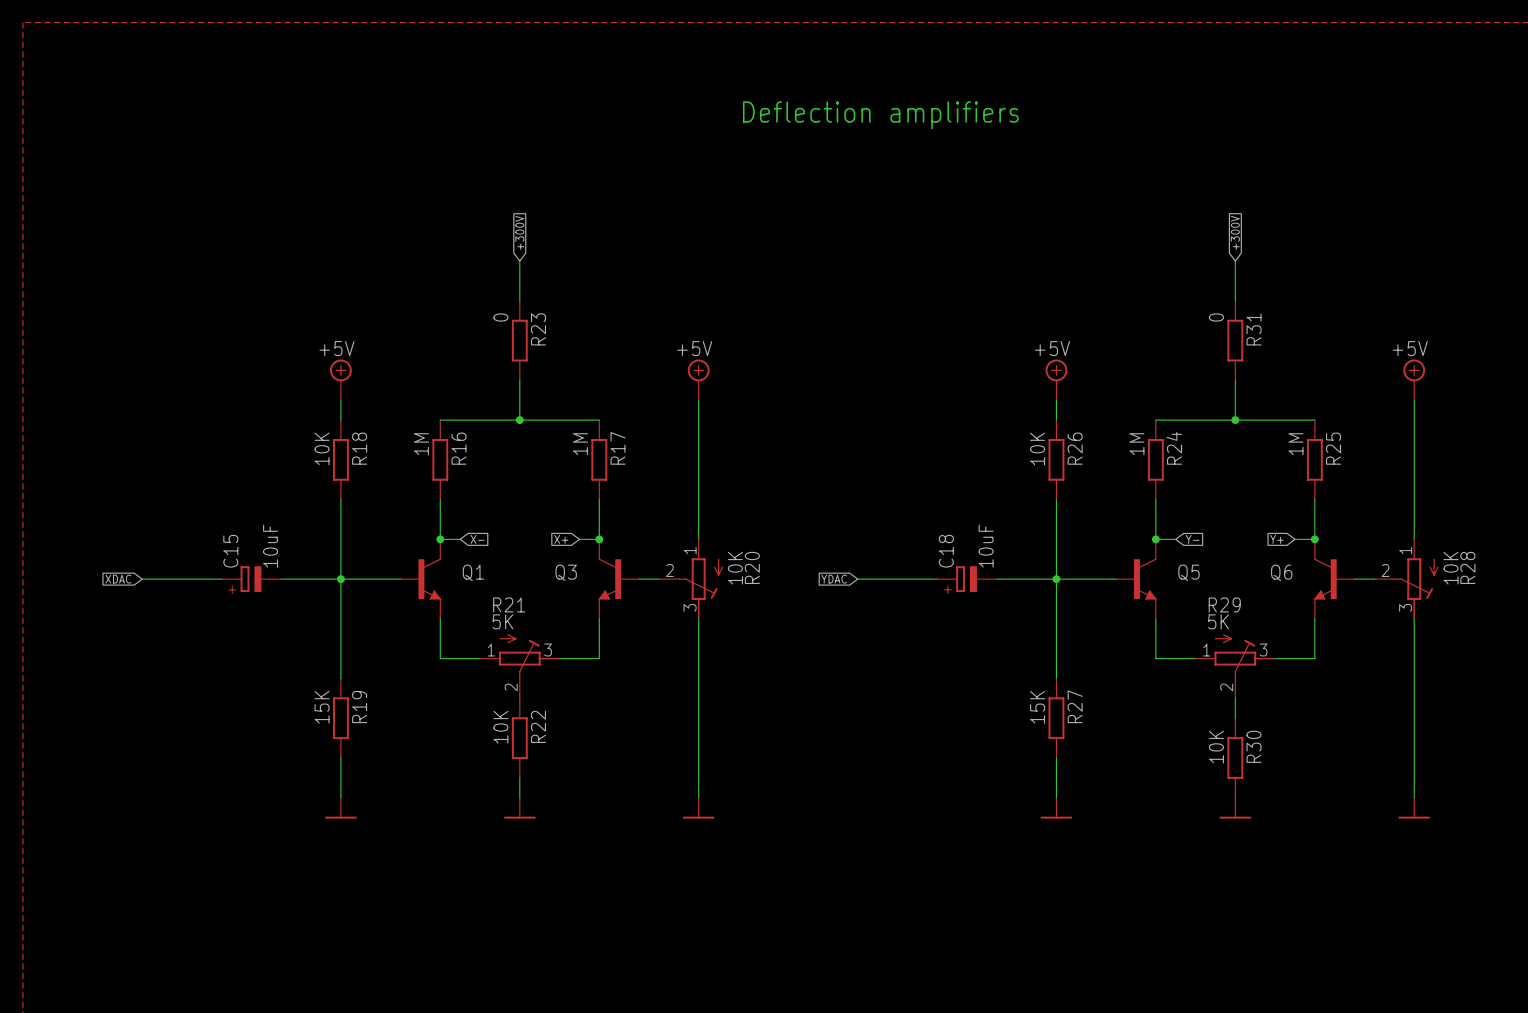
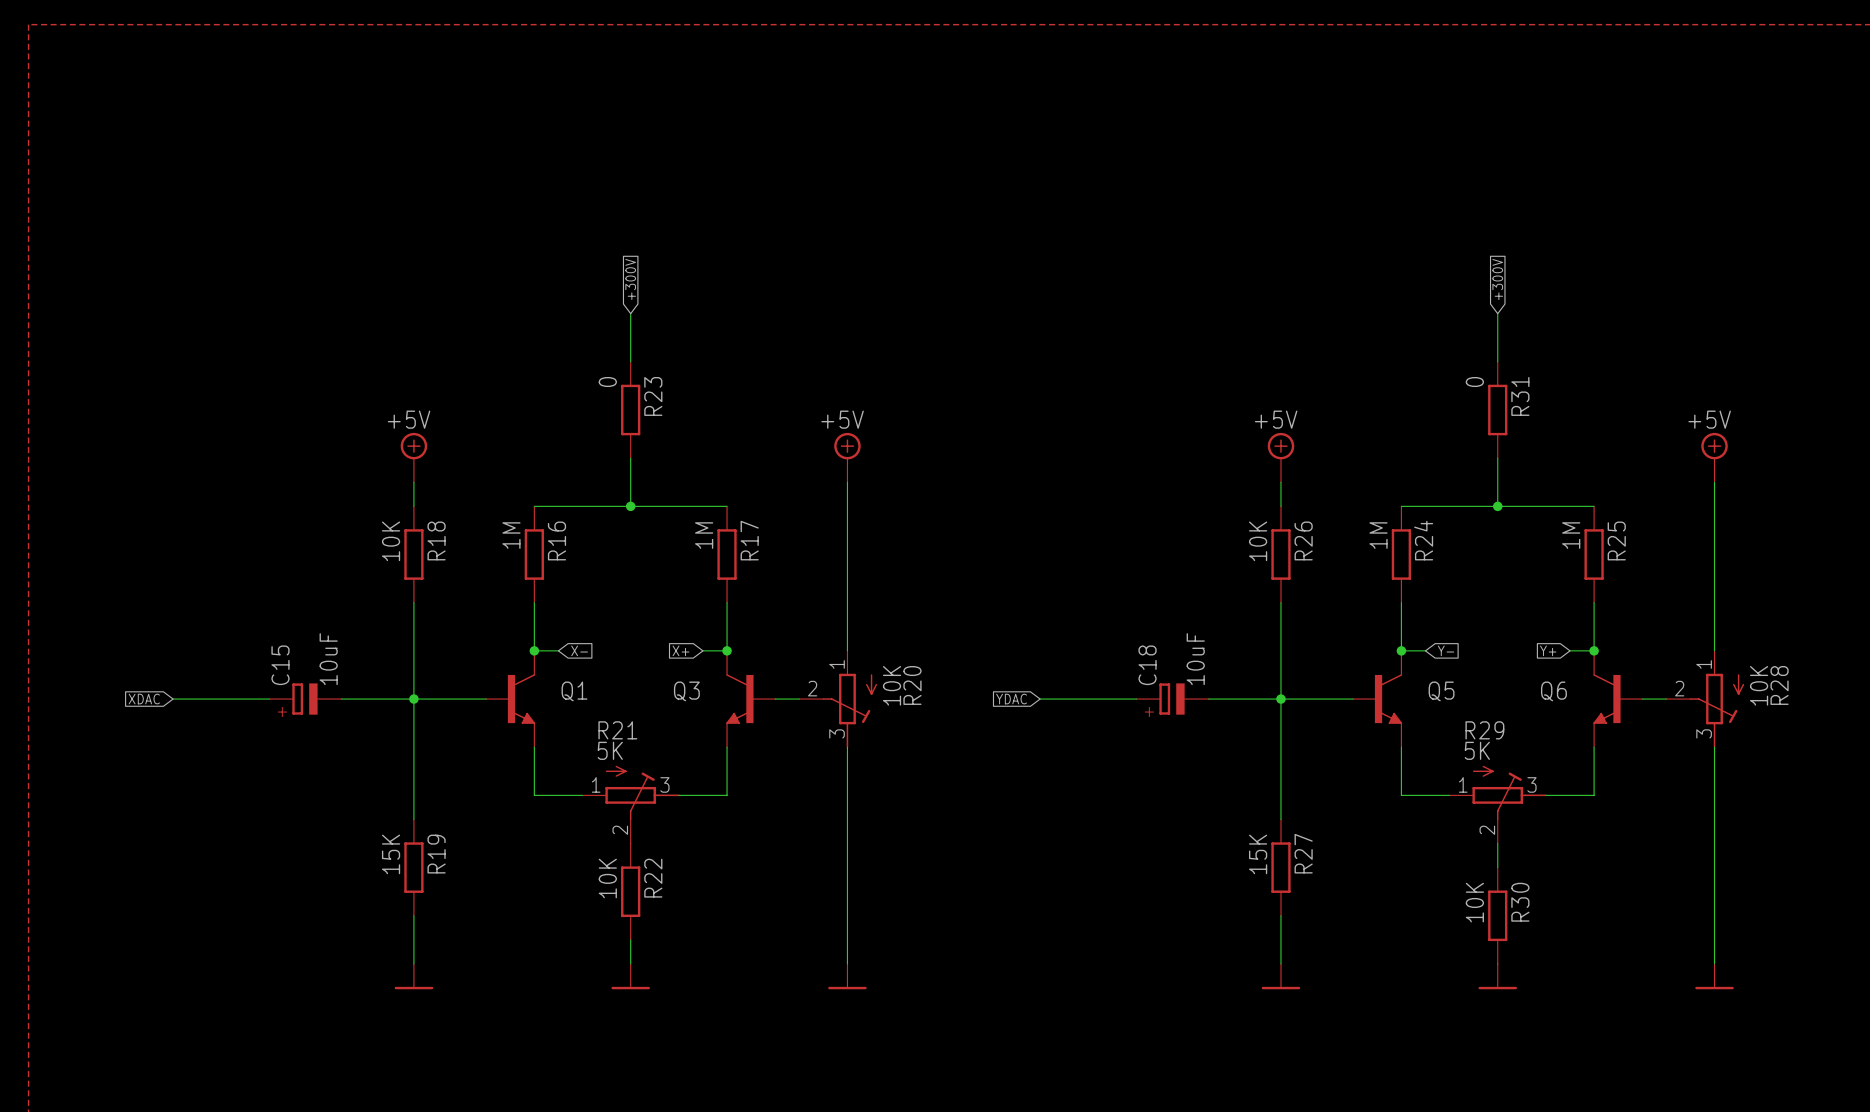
text: Deflection amplifiers (880, 115) -> none

